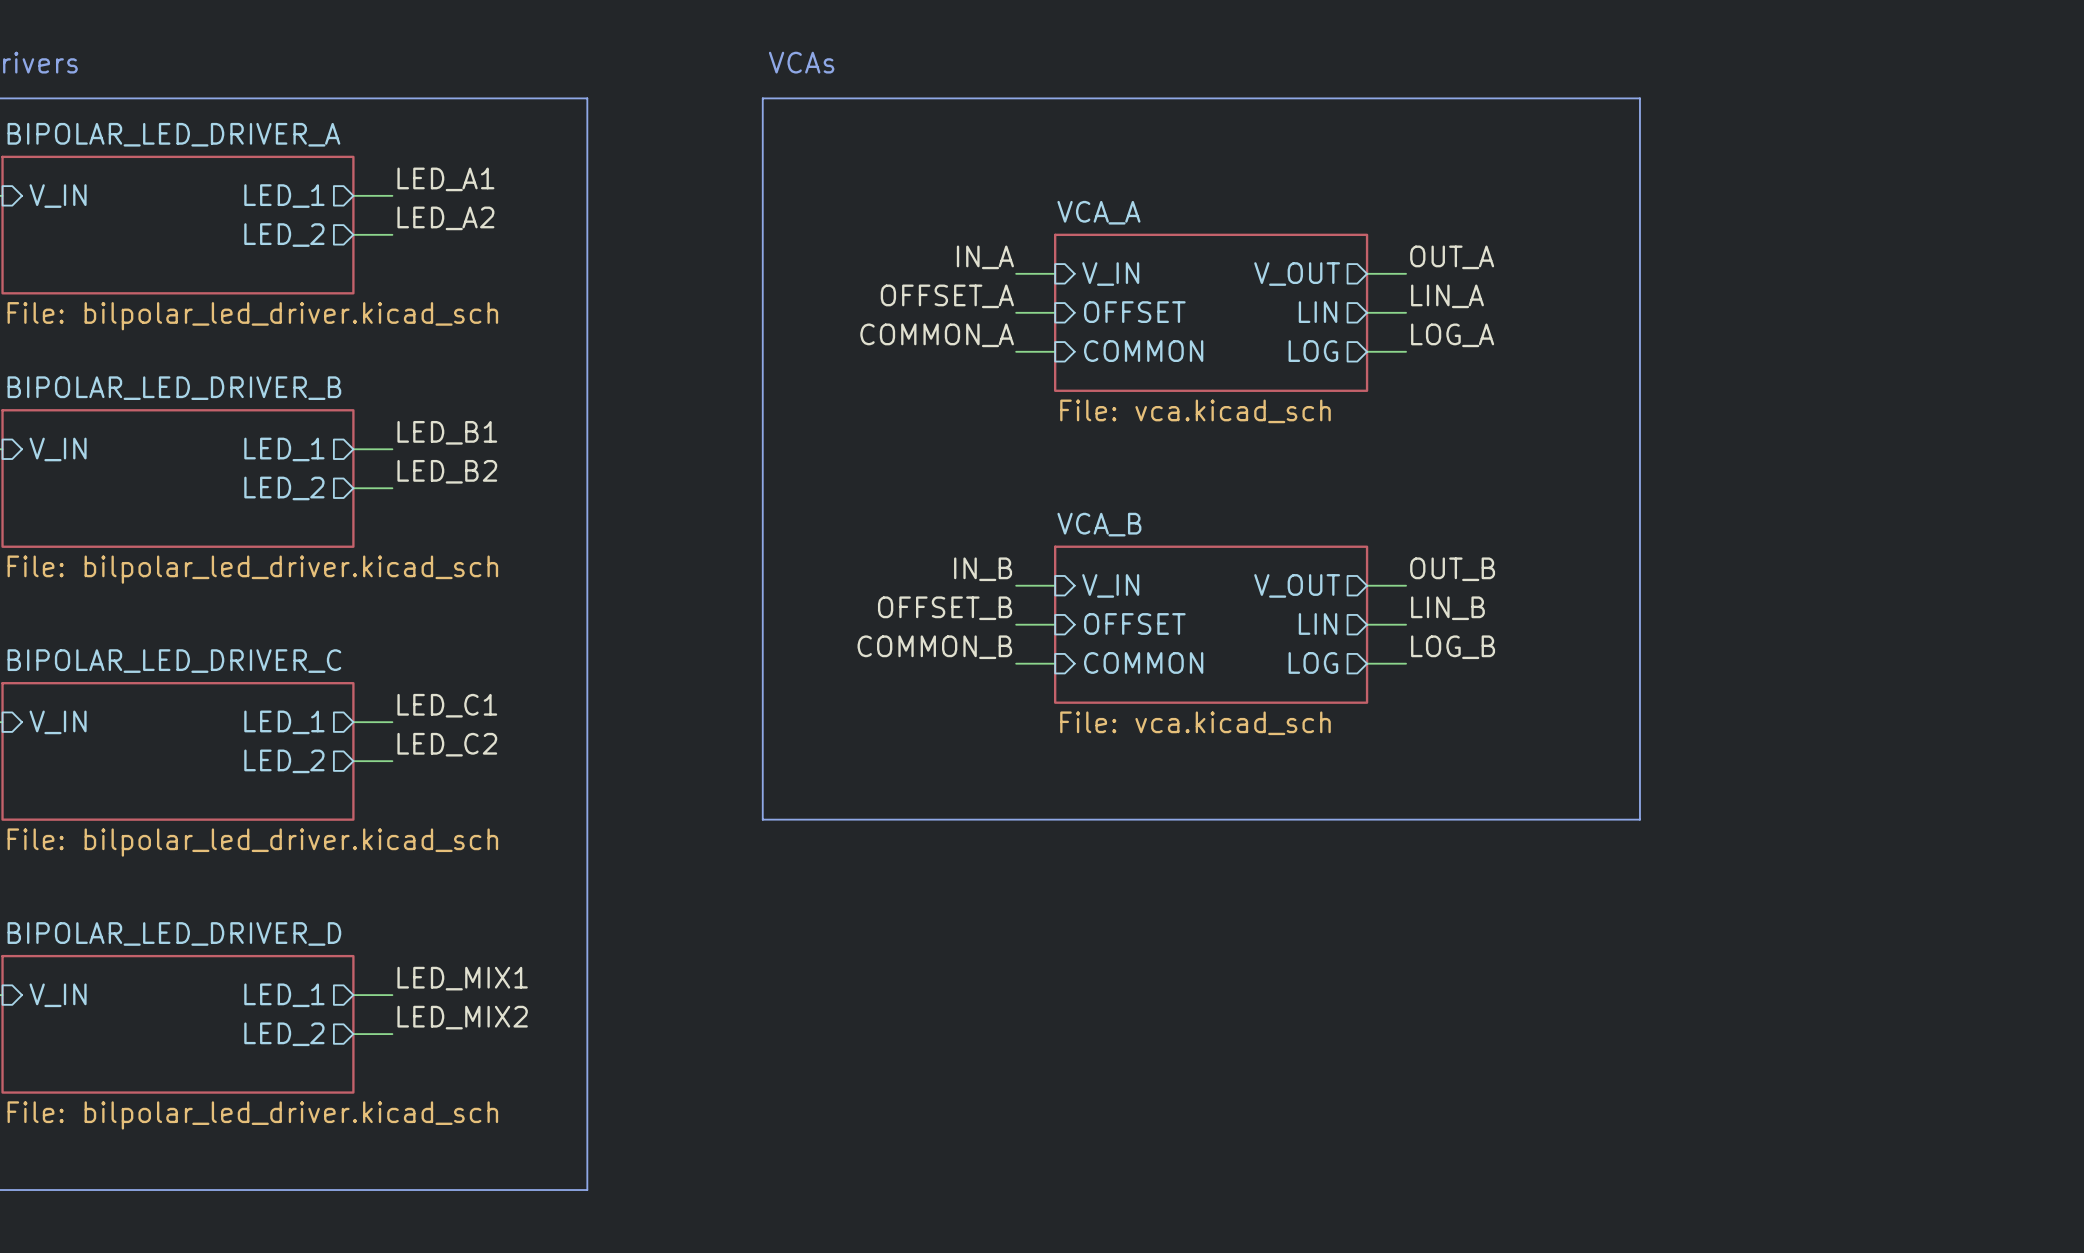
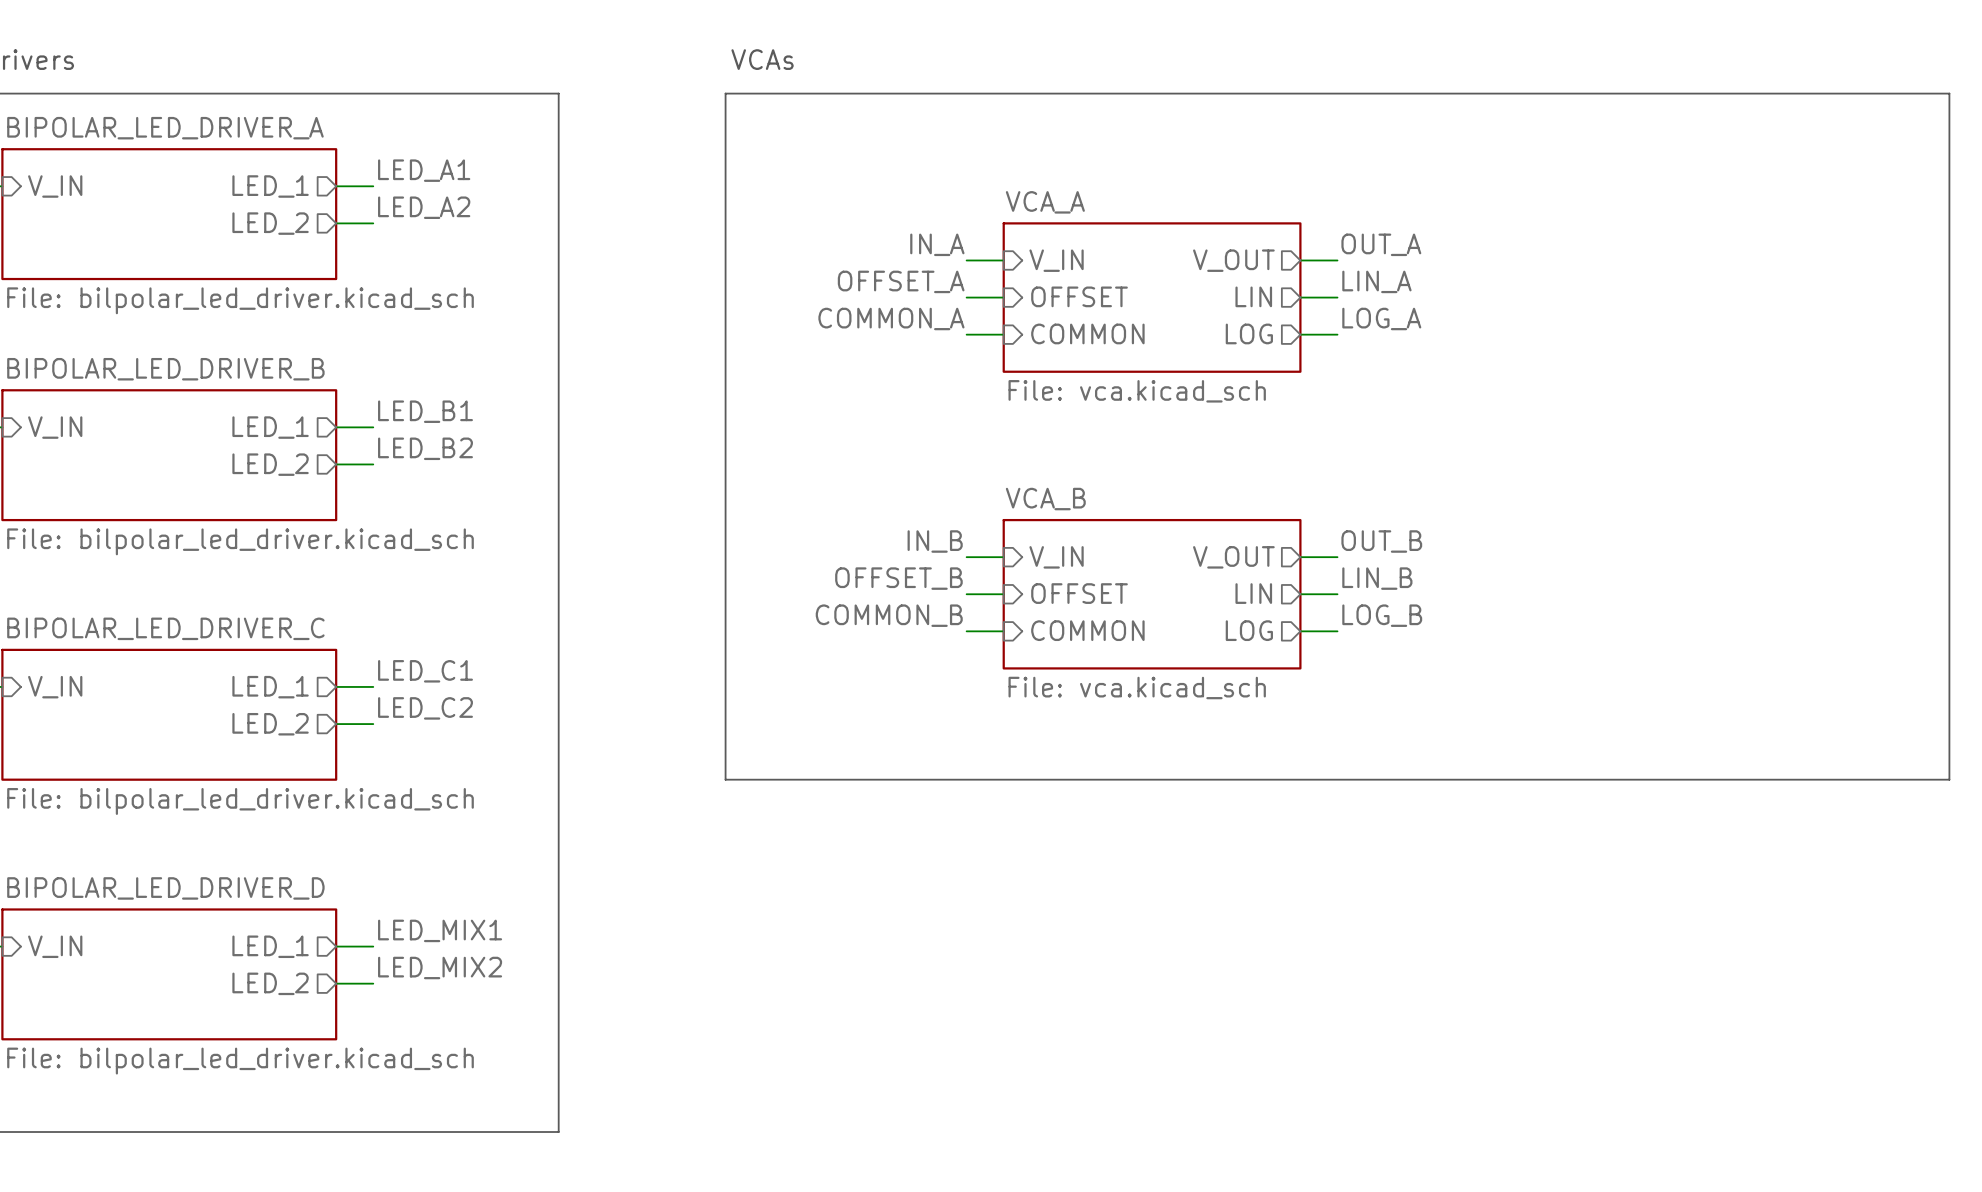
line: (1639, 98) (1639, 819) -> (1560, 93) (1949, 93) (1949, 779) (1560, 779)

